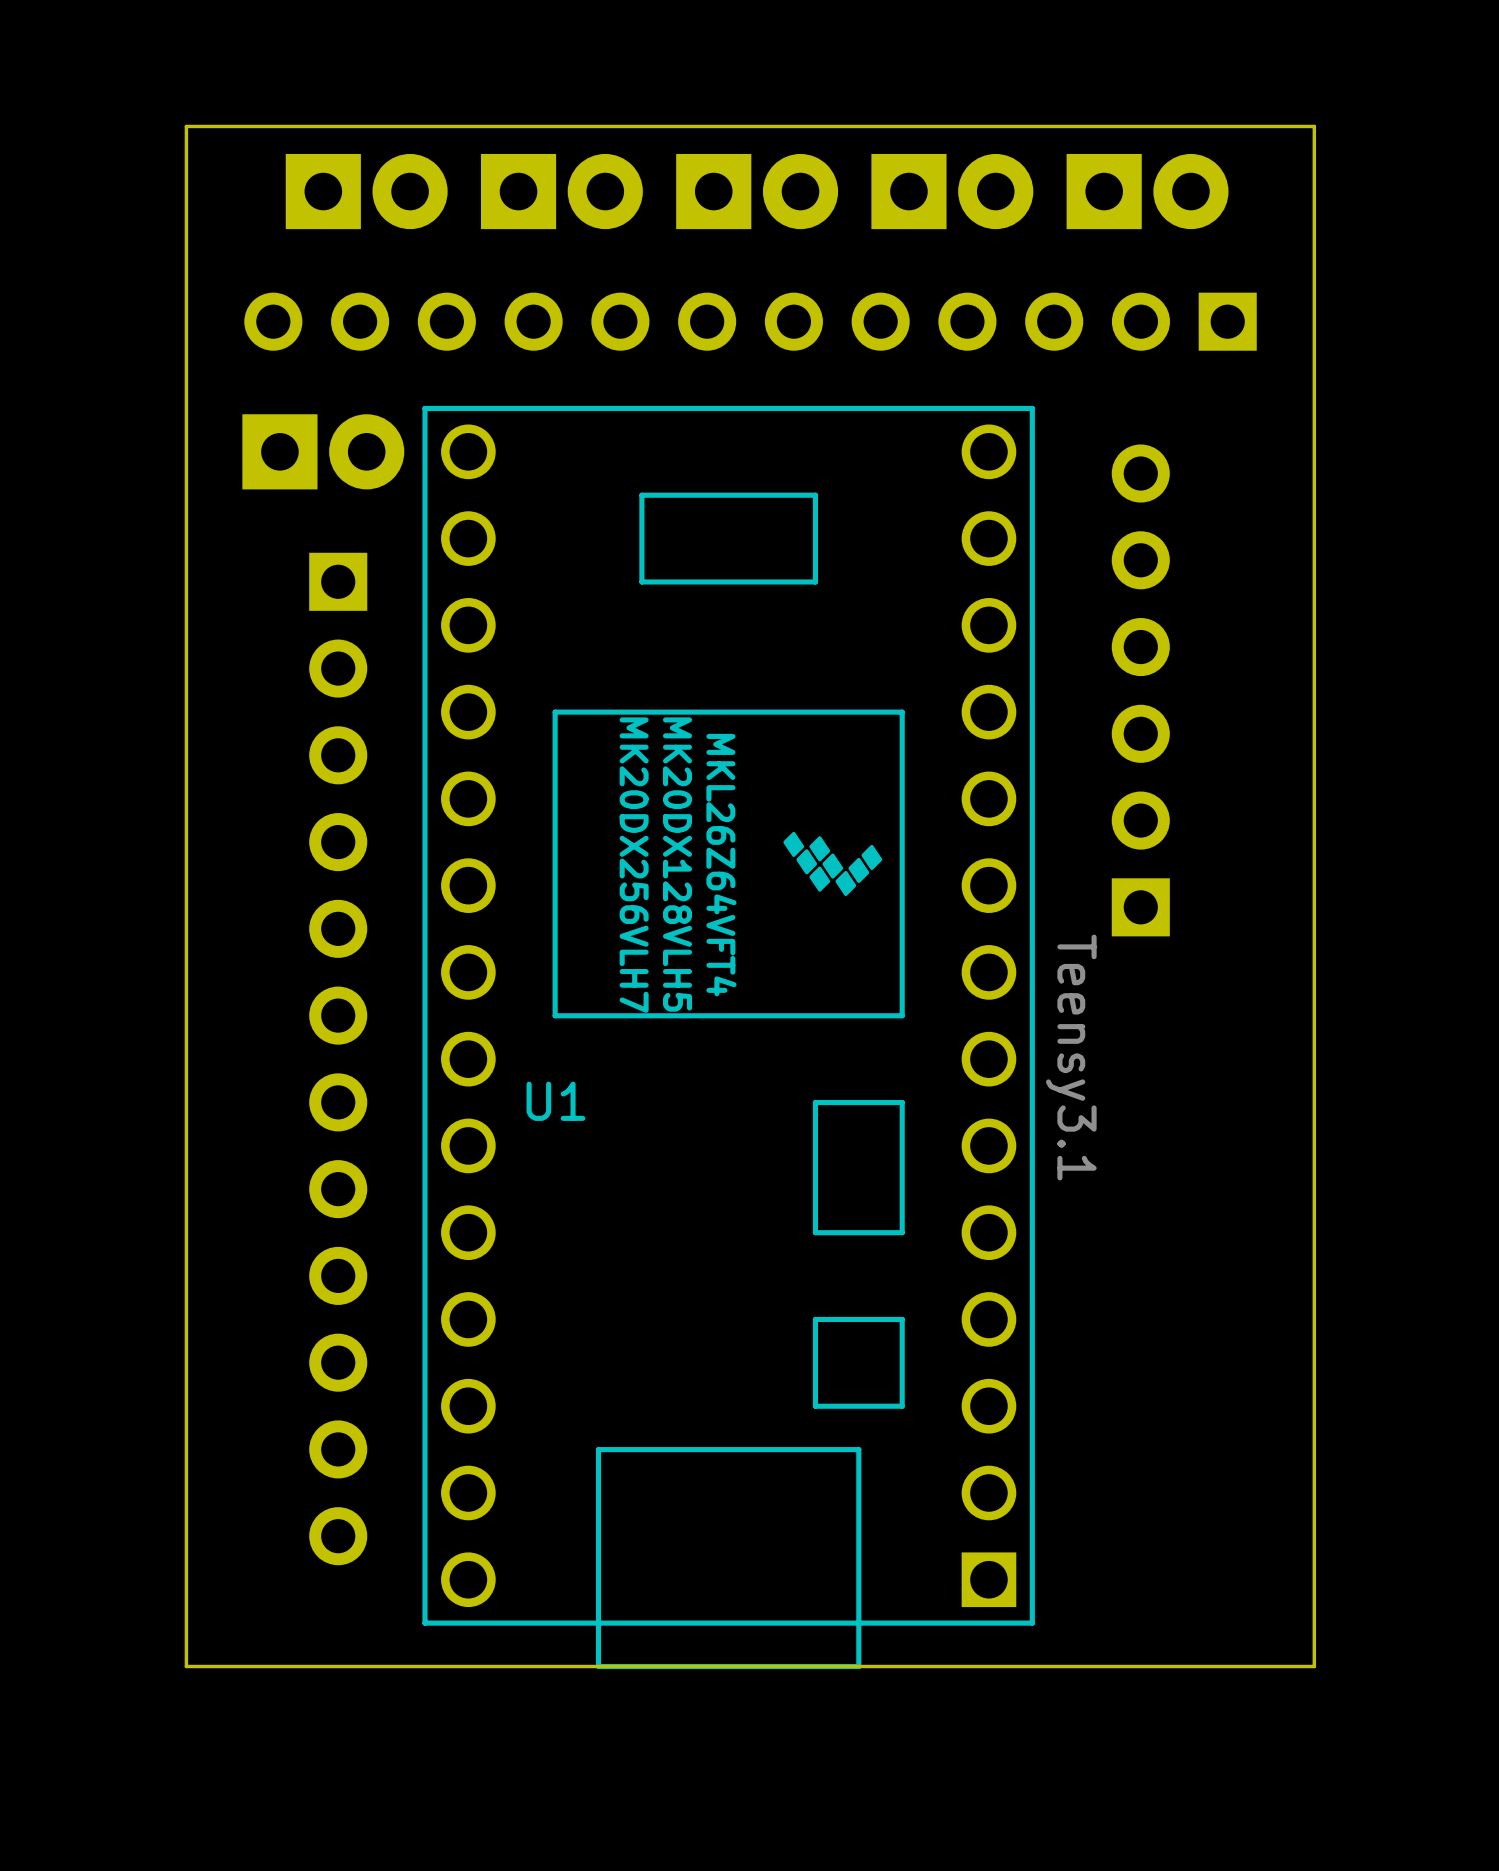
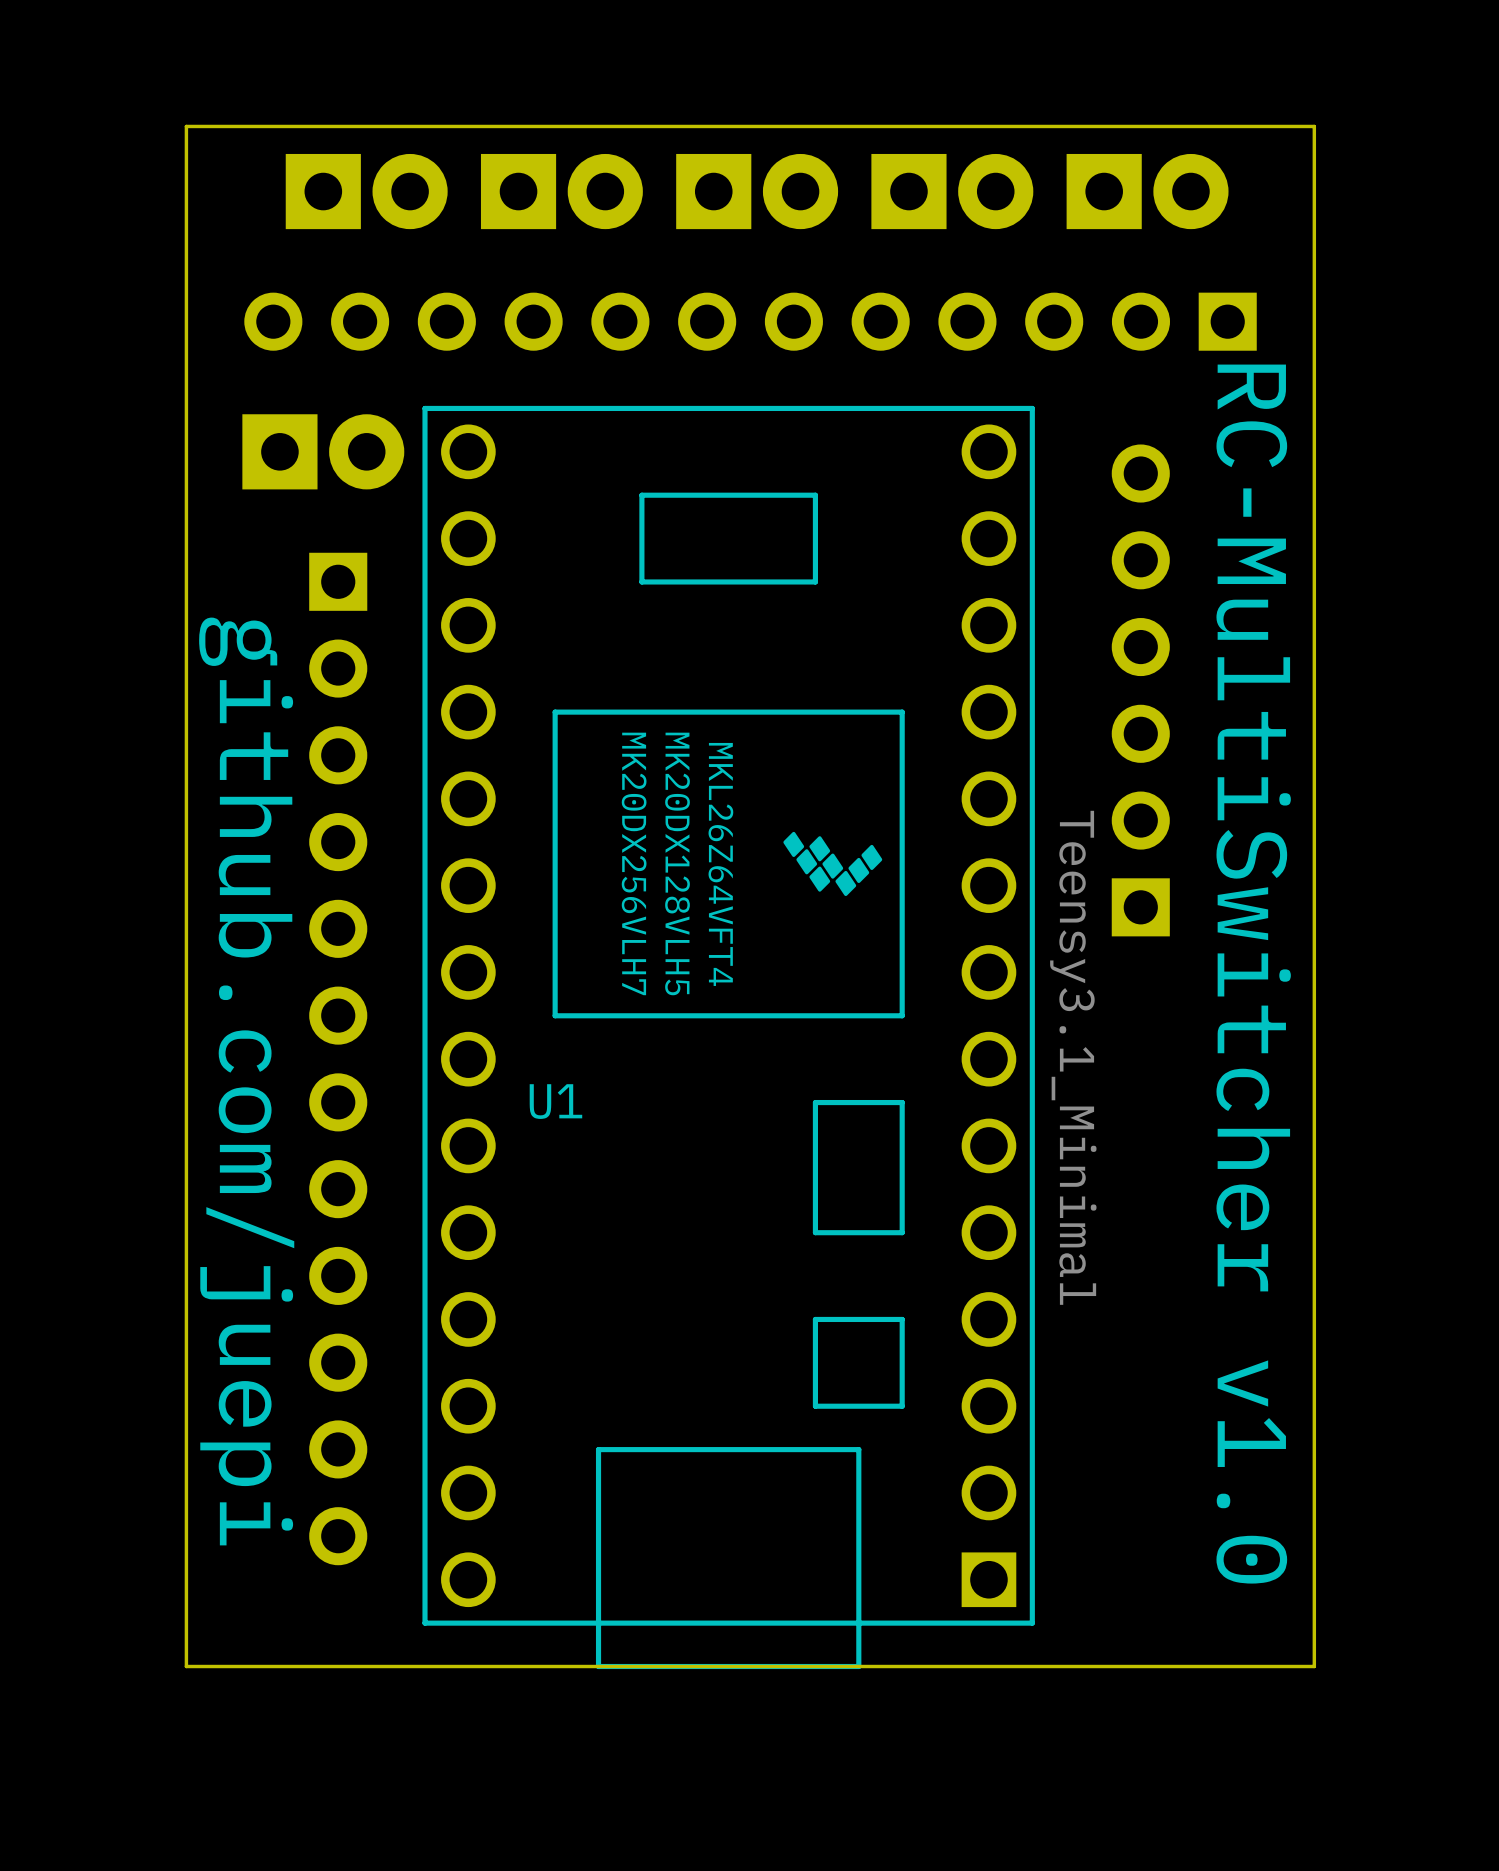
text: none -> RC-MultiSwitcher v1.0 (1253, 974)
U1 value: Teensy3.1 (1071, 1057) -> Teensy3.1_Minimal (1073, 1057)
text: none -> github.com/juepi (246, 1081)

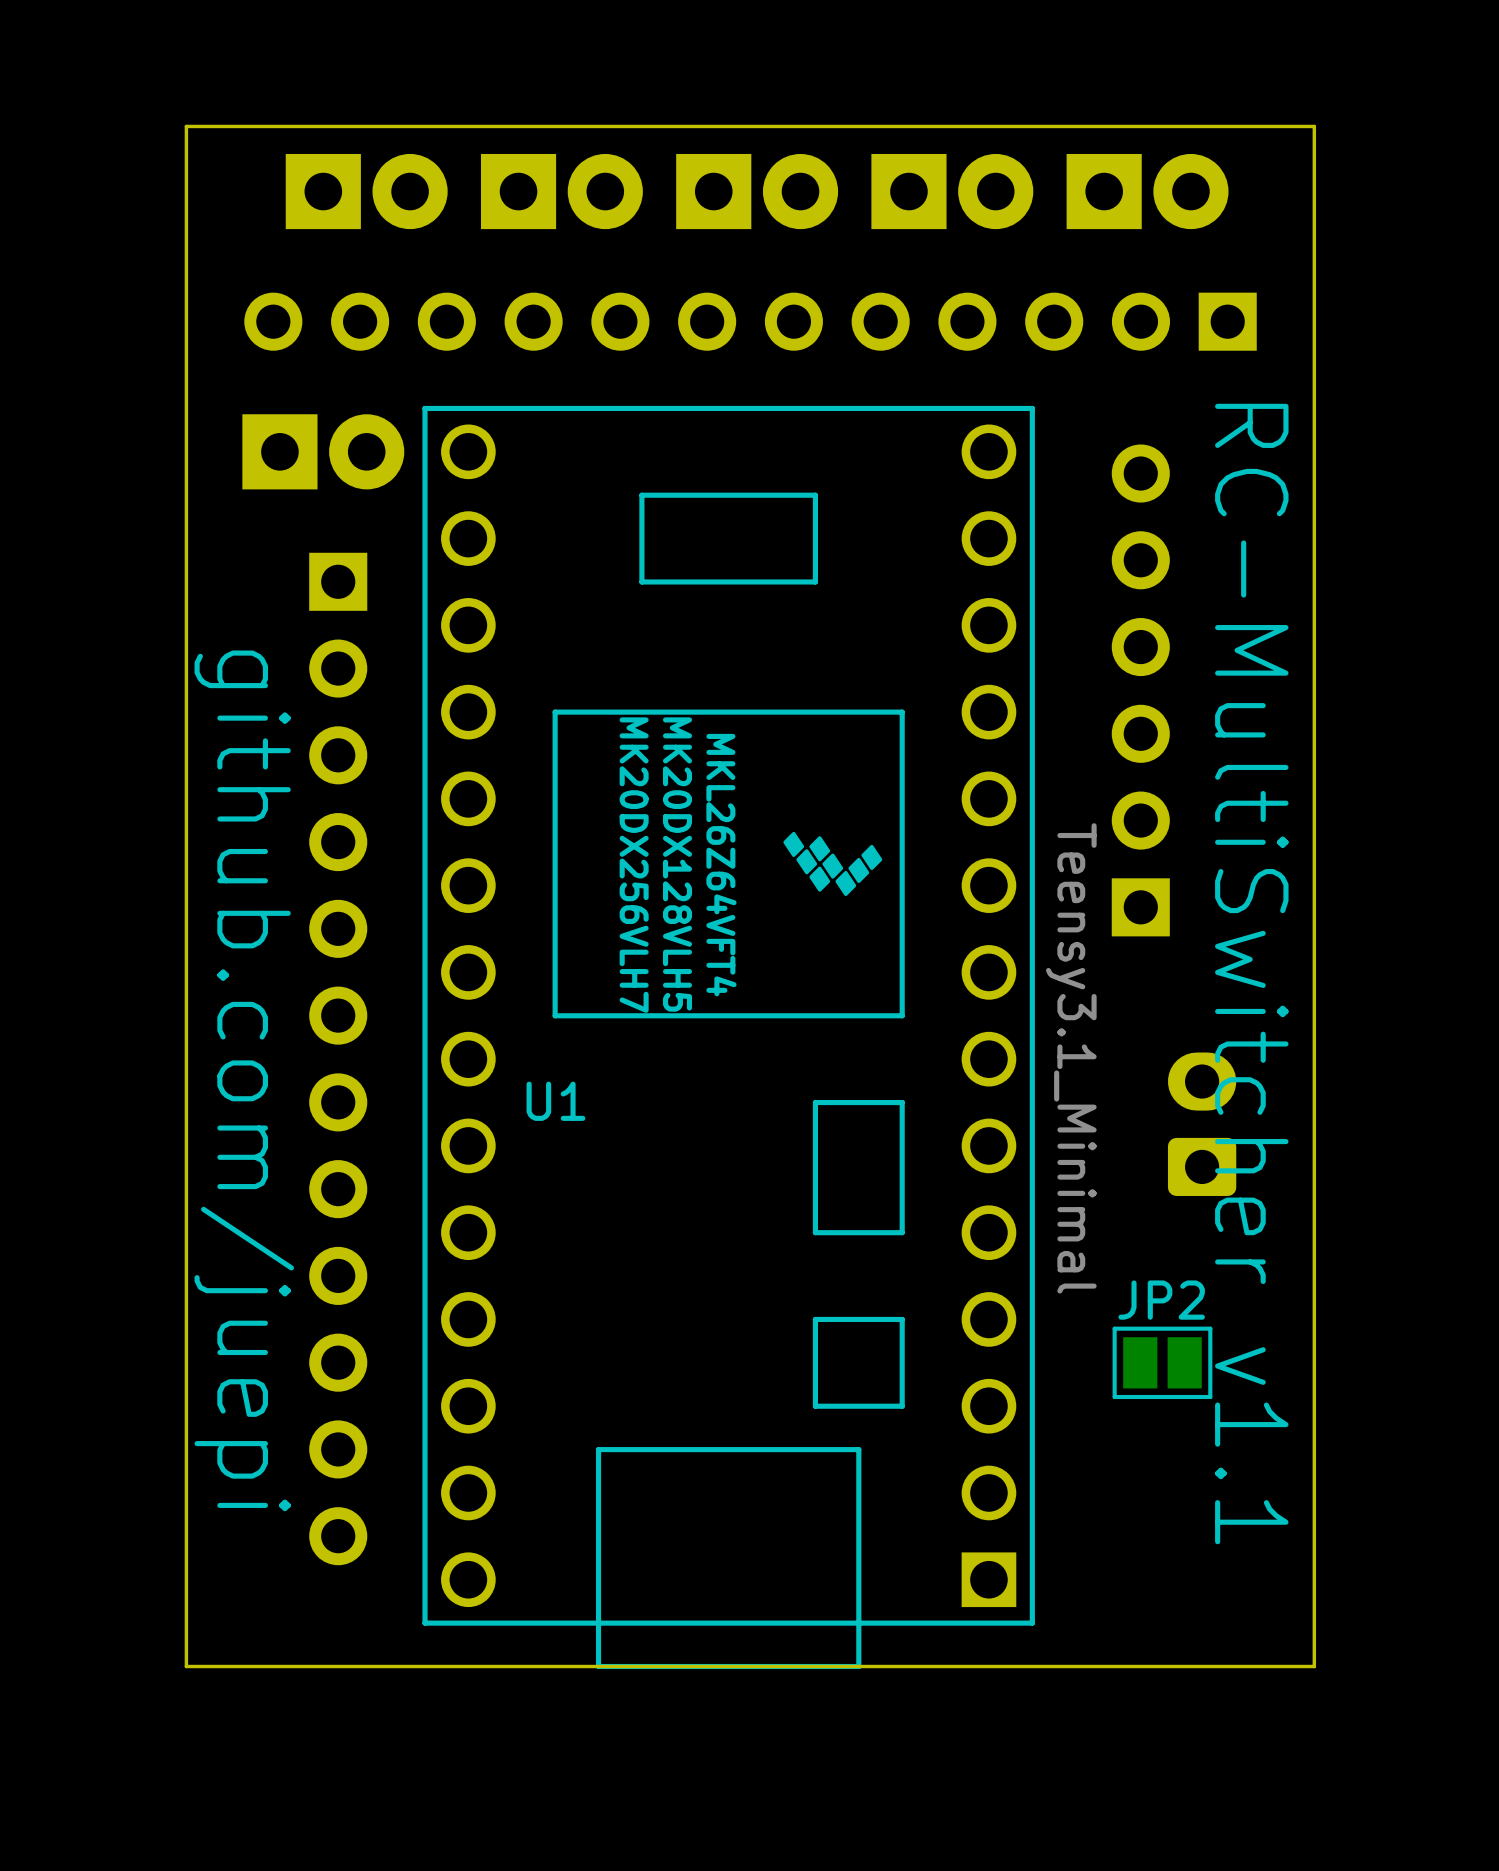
text: RC-MultiSwitcher v1.0 (1253, 974) -> RC-MultiSwitcher v1.1 (1251, 974)
part: none -> (1202, 1124)
JP2: none -> (1162, 1362)

